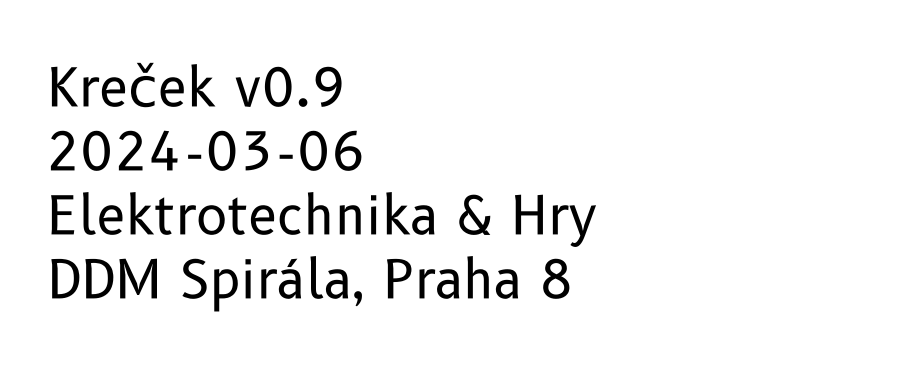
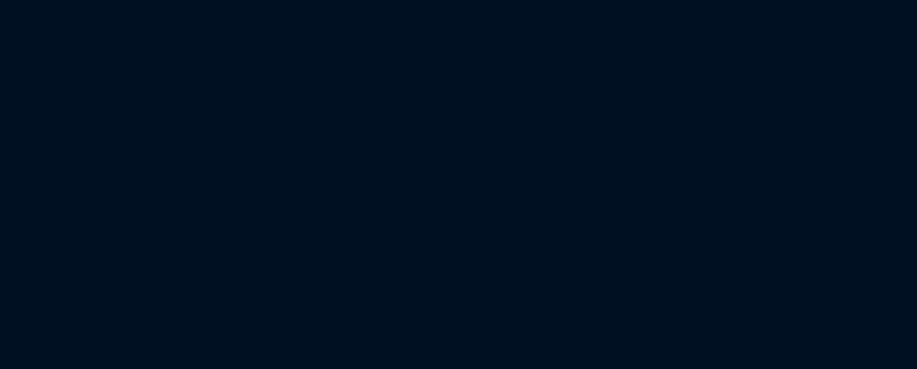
text: Kreček v0.9 (196, 85) -> none
text: 2024-03-06 (206, 150) -> none
text: Elektrotechnika & Hry (323, 219) -> none
text: DDM Spirála, Praha 8 (310, 283) -> none

